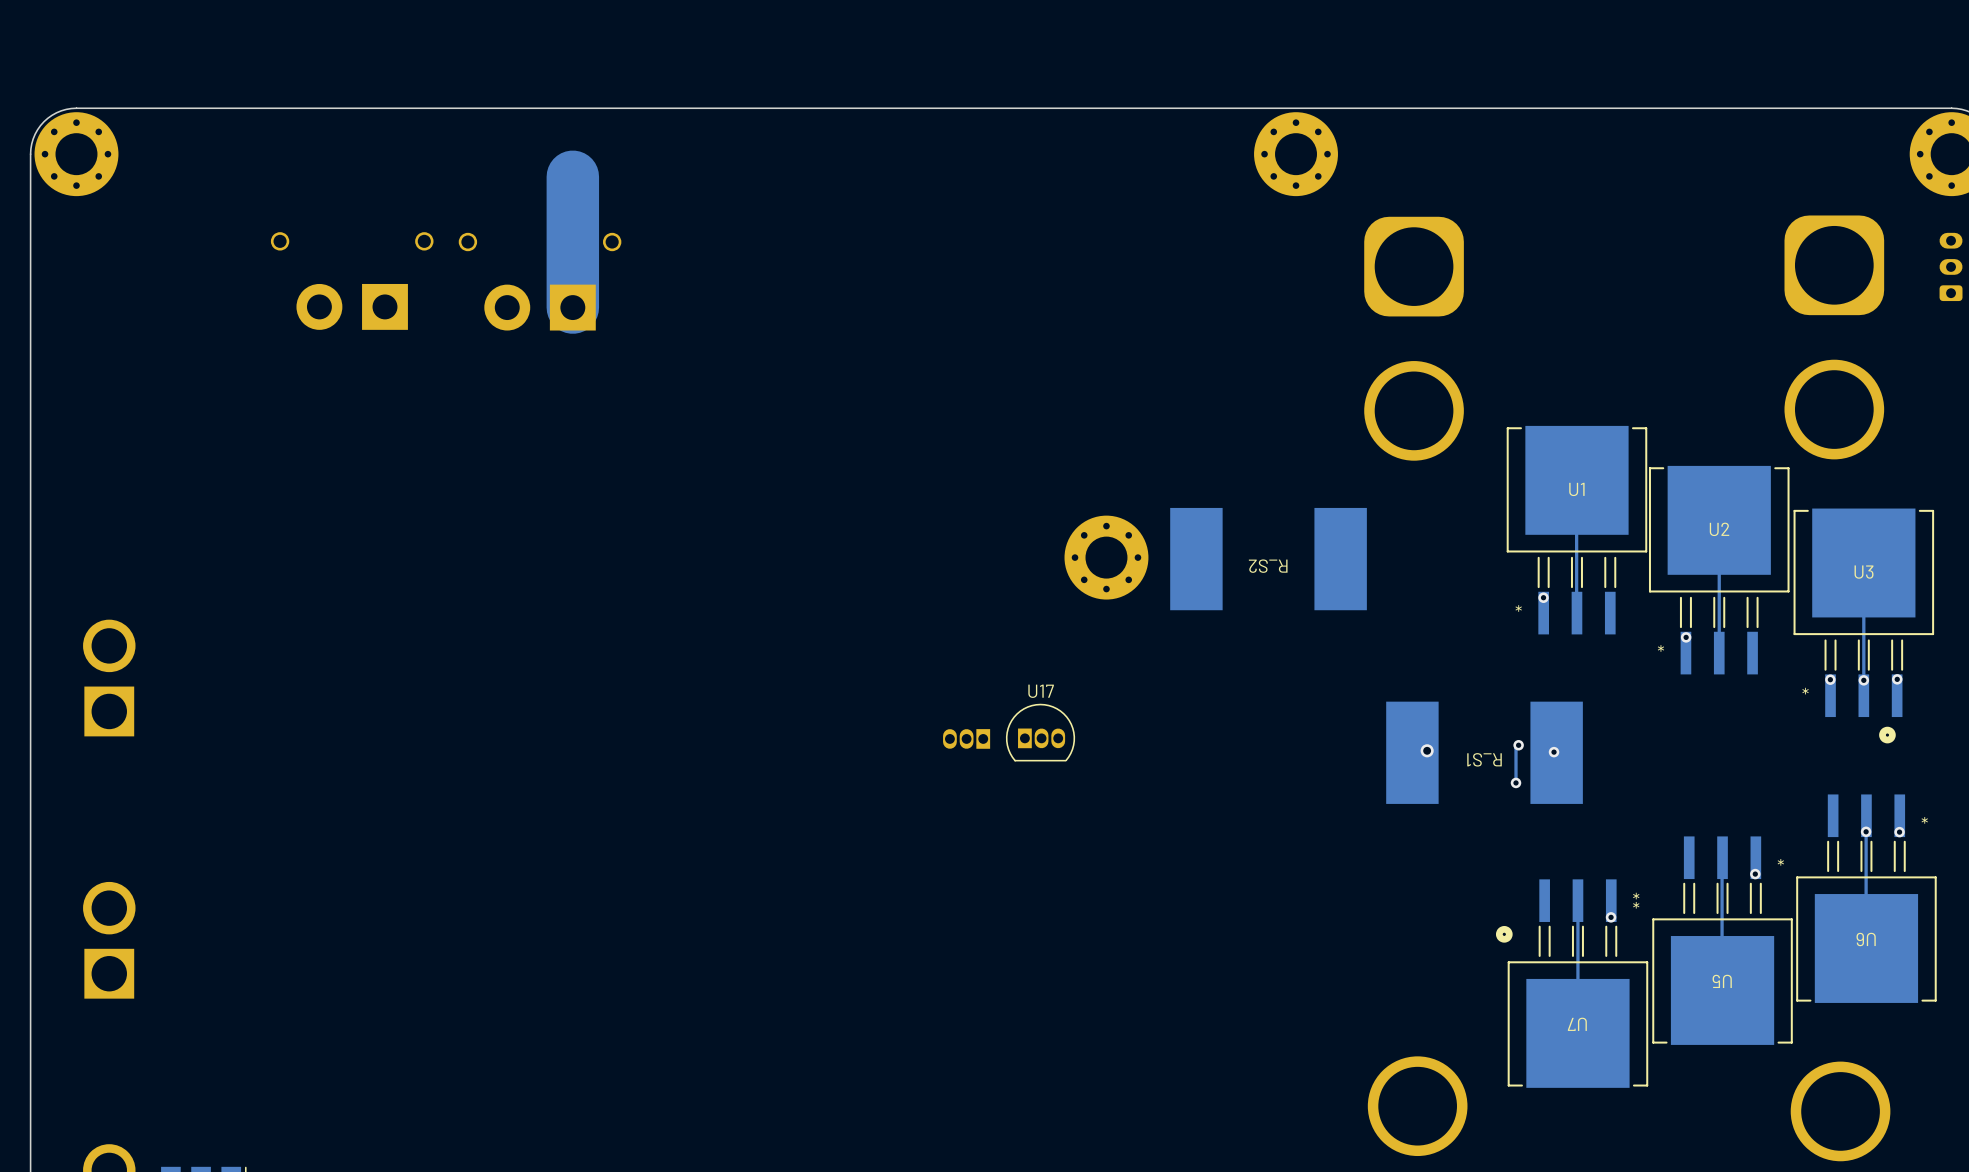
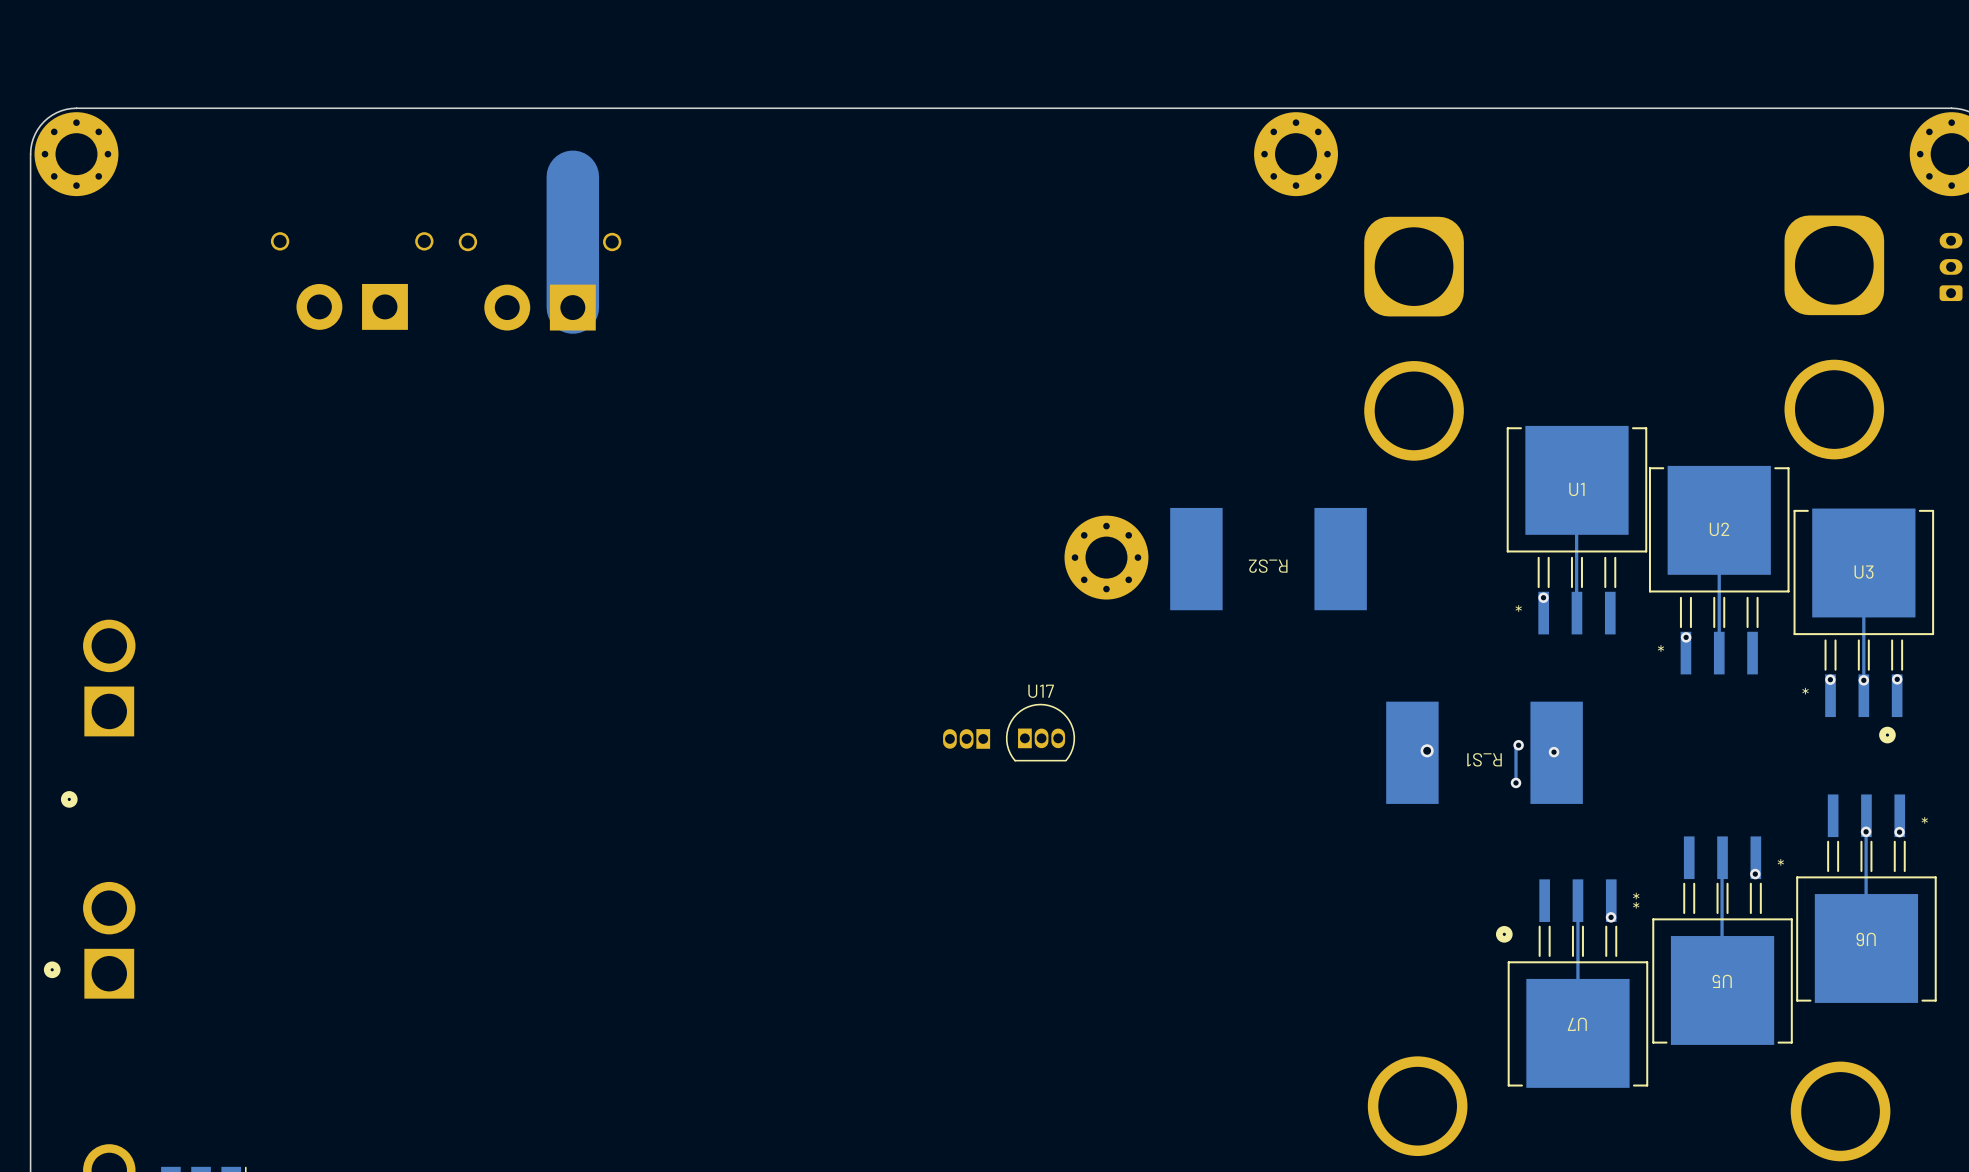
part: none -> (69, 799)
part: none -> (52, 969)

